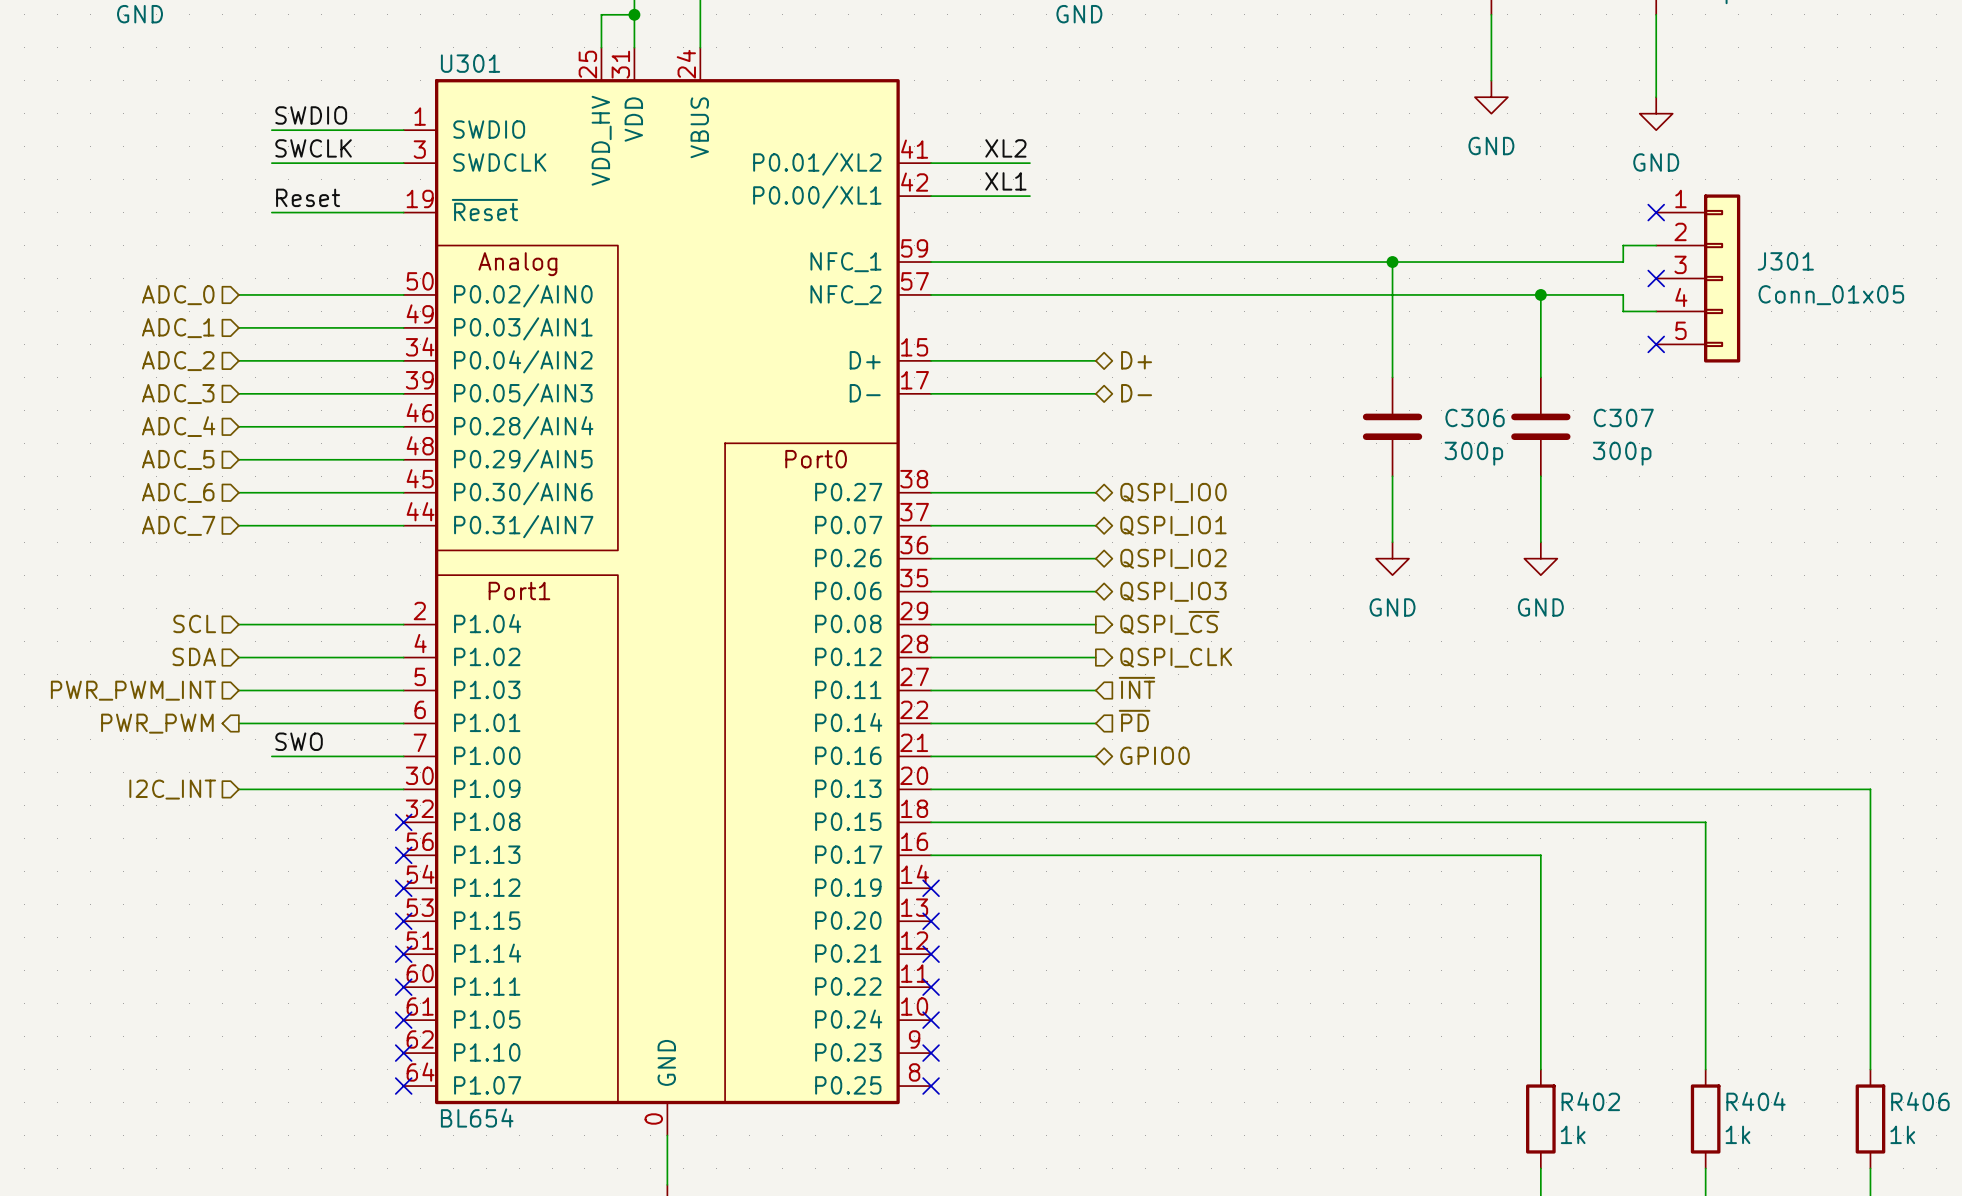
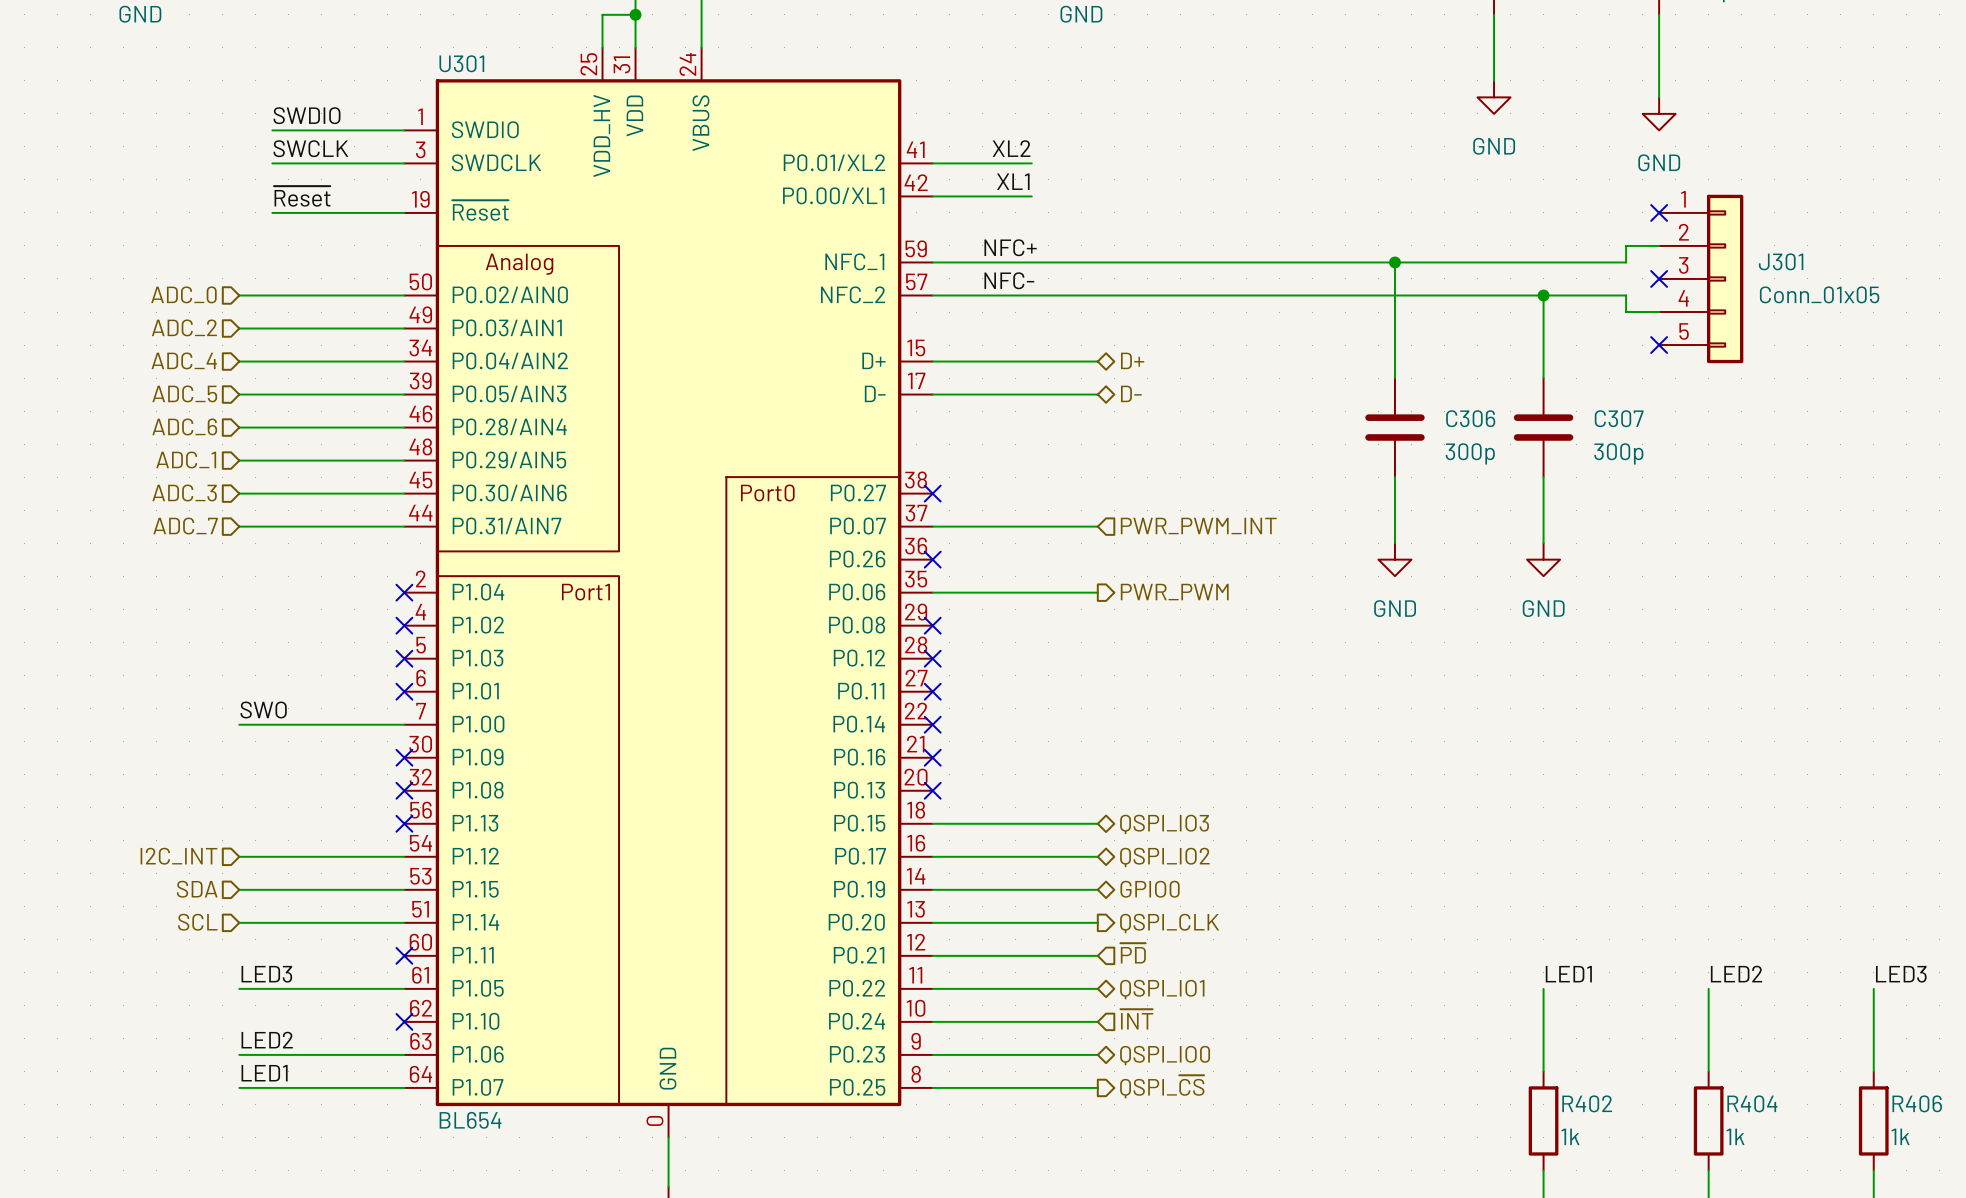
U301 symbol: [403, 47, 932, 1136] -> [404, 47, 933, 1138]
label: Reset (308, 197) -> ~{Reset} (302, 196)
label: none -> NFC+ (1010, 247)
label: none -> NFC- (1009, 280)
hierarchical label: ADC_1 (178, 328) -> ADC_2 (184, 327)
hierarchical label: ADC_2 (178, 361) -> ADC_4 (184, 360)
hierarchical label: ADC_3 (178, 394) -> ADC_5 (184, 393)
hierarchical label: ADC_4 (178, 426) -> ADC_6 (184, 426)
hierarchical label: ADC_5 (178, 459) -> ADC_1 (186, 459)
hierarchical label: ADC_6 (178, 492) -> ADC_3 (184, 493)
wire: (931, 492) (1095, 492) -> none
no-connect mark: none -> (932, 493)
hierarchical label: QSPI_IO0 (1173, 492) -> none
hierarchical label shape: bidirectional (1173, 525) -> input (1198, 525)
hierarchical label: QSPI_IO1 (1173, 525) -> PWR_PWM_INT (1198, 525)
wire: (931, 558) (1095, 558) -> none
no-connect mark: none -> (932, 559)
hierarchical label position: QSPI_IO2 (1173, 558) -> QSPI_IO2 (1164, 857)
no-connect mark: none -> (404, 592)
hierarchical label shape: bidirectional (1173, 591) -> output (1174, 592)
hierarchical label: QSPI_IO3 (1173, 591) -> PWR_PWM (1174, 592)
hierarchical label: QSPI_~{CS} (1169, 622) -> none
hierarchical label position: SCL (194, 623) -> SCL (197, 922)
wire: (238, 624) (403, 624) -> (239, 889) (404, 889)
no-connect mark: none -> (404, 625)
wire: (931, 624) (1095, 624) -> (932, 889) (1097, 889)
no-connect mark: none -> (932, 625)
hierarchical label position: SDA (194, 656) -> SDA (197, 889)
wire: (238, 657) (403, 657) -> (239, 922) (404, 922)
no-connect mark: none -> (404, 658)
wire: (931, 657) (1095, 657) -> (932, 922) (1097, 922)
no-connect mark: none -> (932, 658)
hierarchical label position: QSPI_CLK (1176, 657) -> QSPI_CLK (1169, 923)
hierarchical label: ~{INT} (1136, 687) -> none
hierarchical label: PWR_PWM_INT (133, 690) -> none
wire: (238, 690) (403, 690) -> (239, 988) (404, 988)
no-connect mark: none -> (404, 691)
wire: (931, 690) (1095, 690) -> (932, 955) (1097, 955)
no-connect mark: none -> (932, 691)
hierarchical label position: ~{PD} (1134, 720) -> ~{PD} (1133, 953)
hierarchical label: PWR_PWM (157, 723) -> none
wire: (931, 723) (1095, 723) -> (932, 988) (1097, 988)
no-connect mark: none -> (932, 724)
label position: SWO (299, 741) -> SWO (263, 710)
hierarchical label position: GPIO0 (1154, 755) -> GPIO0 (1150, 889)
wire: (271, 756) (403, 756) -> none
no-connect mark: none -> (404, 757)
wire: (931, 756) (1095, 756) -> (932, 1021) (1097, 1021)
no-connect mark: none -> (932, 757)
hierarchical label position: I2C_INT (172, 789) -> I2C_INT (178, 856)
wire: (238, 789) (403, 789) -> (239, 1054) (404, 1054)
no-connect mark: none -> (404, 790)
wire: (931, 789) (1870, 789) (1870, 987) -> none
no-connect mark: none -> (932, 790)
wire: (1095, 822) (1705, 822) (1705, 987) -> none
hierarchical label: none -> QSPI_IO3 (1164, 824)
wire: none -> (239, 856) (404, 856)
no-connect mark: (403, 855) -> none
wire: (1095, 855) (1540, 855) (1540, 987) -> none
no-connect mark: (403, 888) -> none
no-connect mark: (931, 888) -> none
no-connect mark: (403, 921) -> none
no-connect mark: (931, 921) -> none
no-connect mark: (931, 954) -> none
label: none -> LED3 (266, 974)
label: none -> LED1 (1568, 974)
label: none -> LED2 (1736, 974)
label: none -> LED3 (1901, 974)
no-connect mark: (403, 987) -> none
no-connect mark: (931, 987) -> none
hierarchical label: none -> QSPI_IO1 (1162, 989)
hierarchical label: none -> ~{INT} (1136, 1019)
no-connect mark: (931, 1020) -> none
label: none -> LED2 (267, 1040)
no-connect mark: (403, 1053) -> none
wire: none -> (932, 1054) (1097, 1054)
no-connect mark: (931, 1053) -> none
hierarchical label: none -> QSPI_IO0 (1165, 1055)
label: none -> LED1 (264, 1073)
hierarchical label: none -> QSPI_~{CS} (1162, 1086)
wire: none -> (239, 1087) (404, 1087)
no-connect mark: (403, 1086) -> none
wire: none -> (932, 1087) (1097, 1087)
no-connect mark: (931, 1086) -> none

